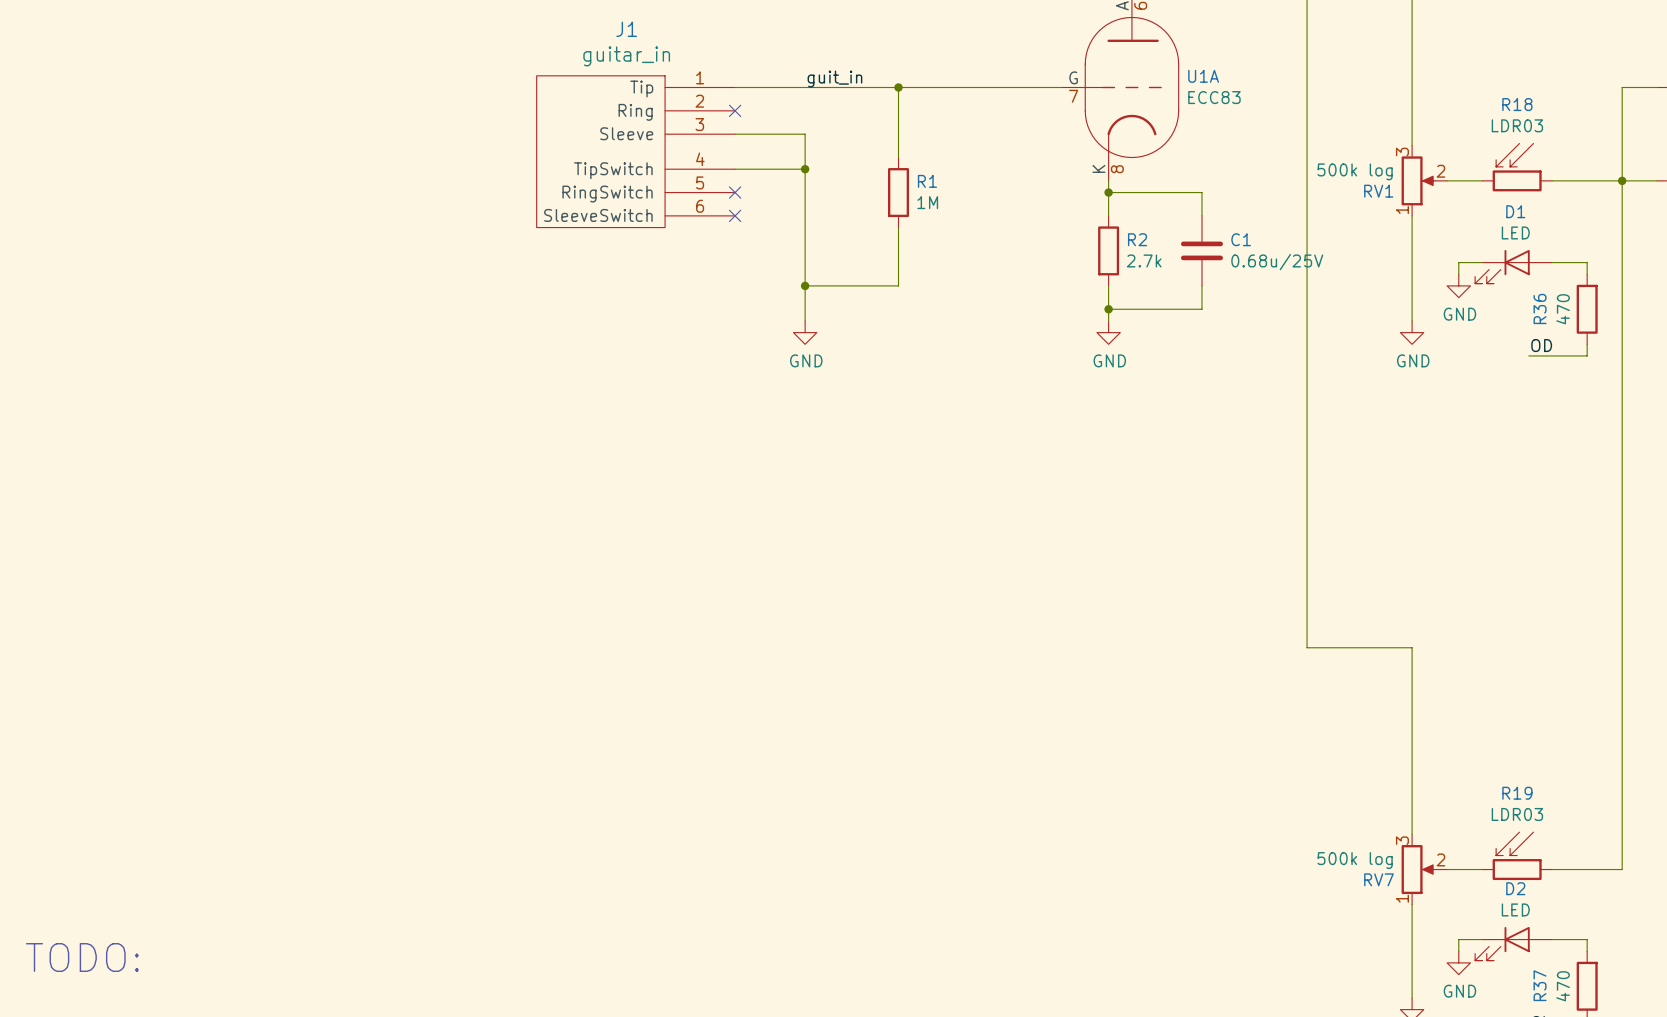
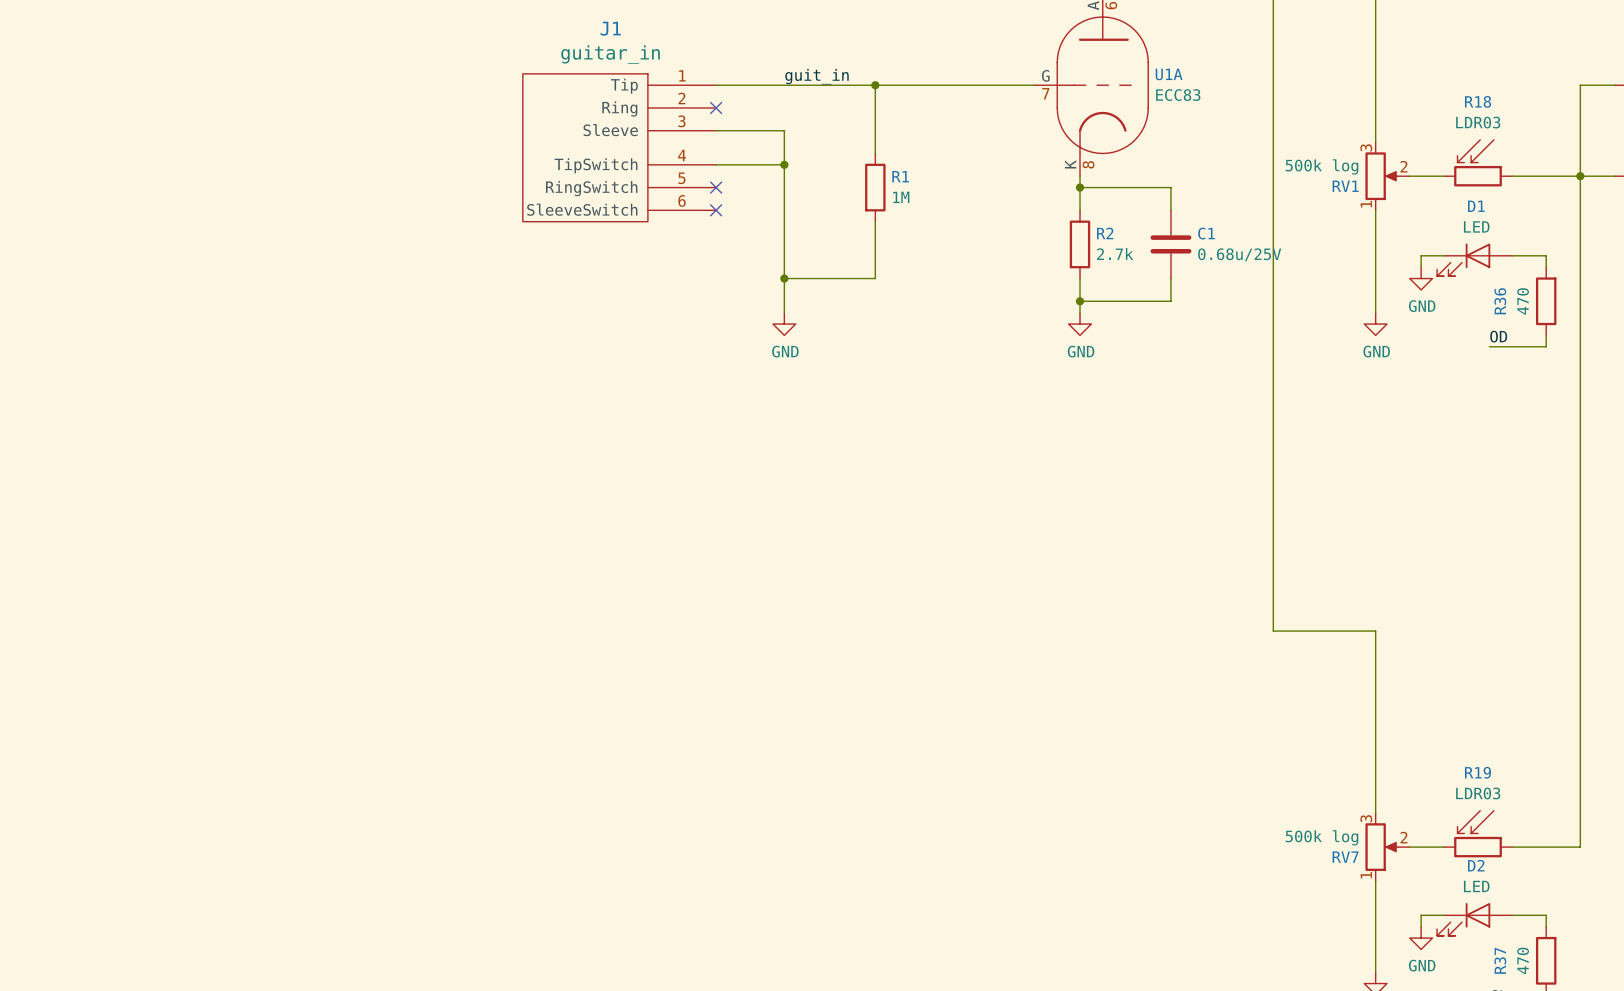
text: TODO: (82, 957) -> none

